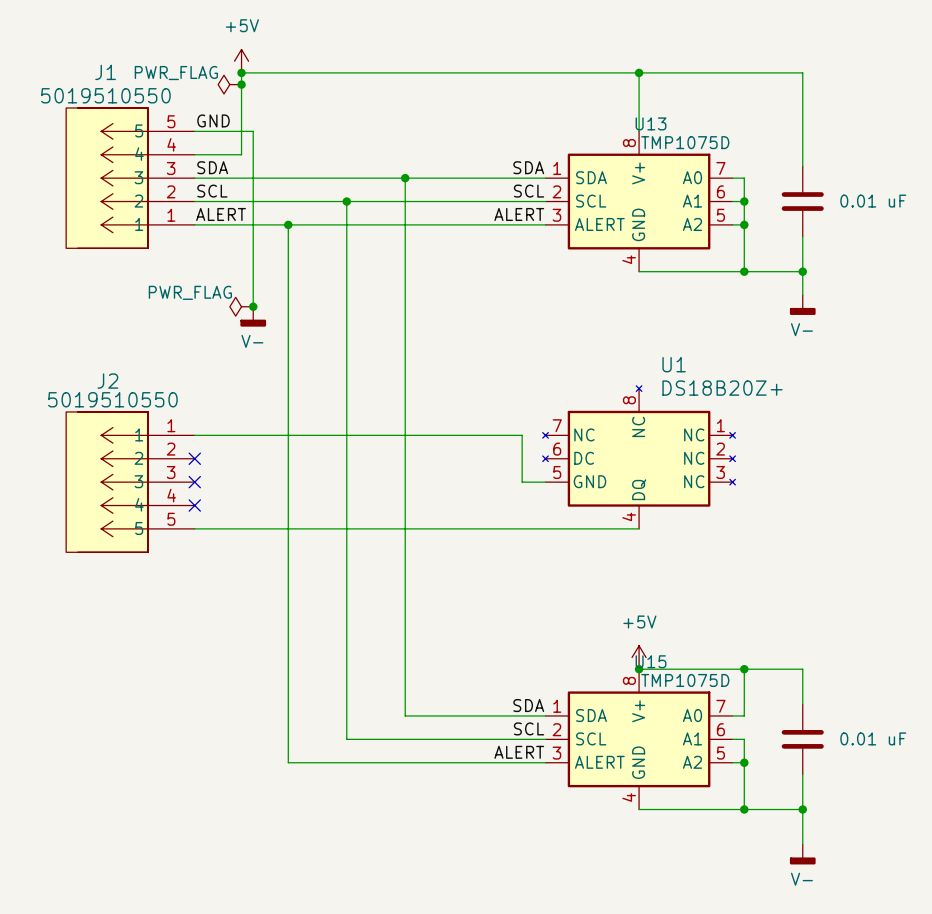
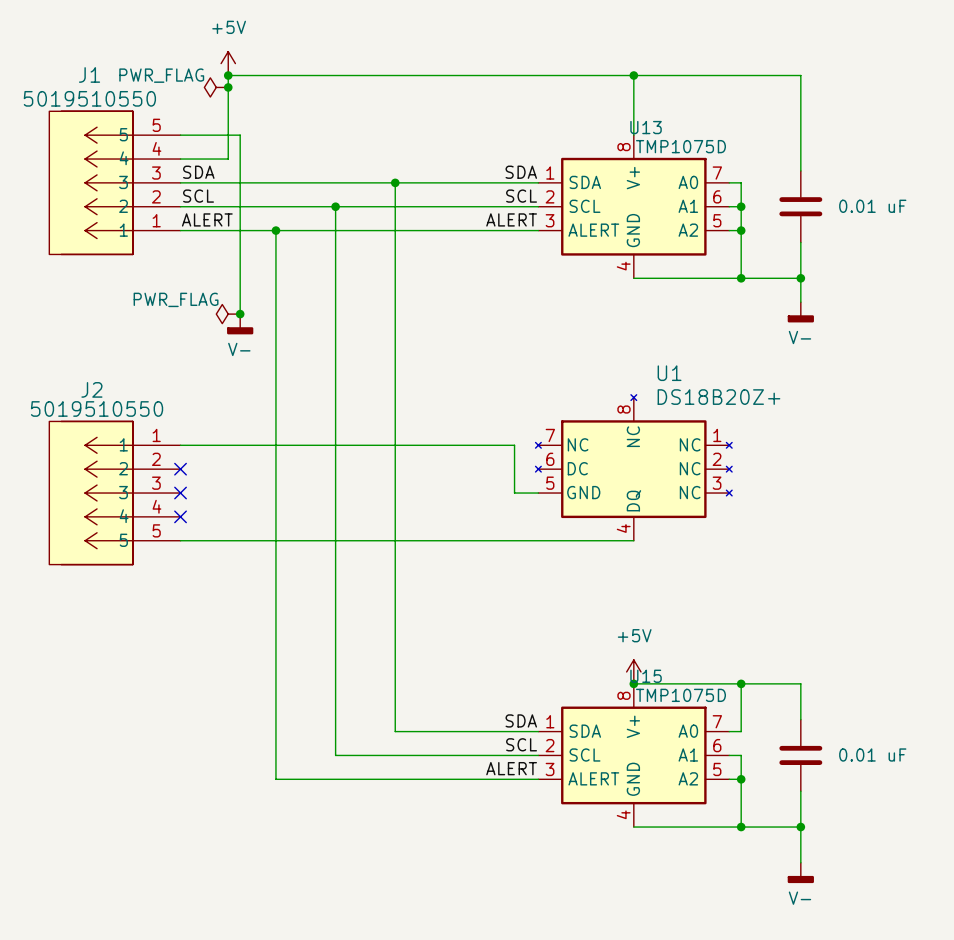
label: GND (213, 120) -> none

